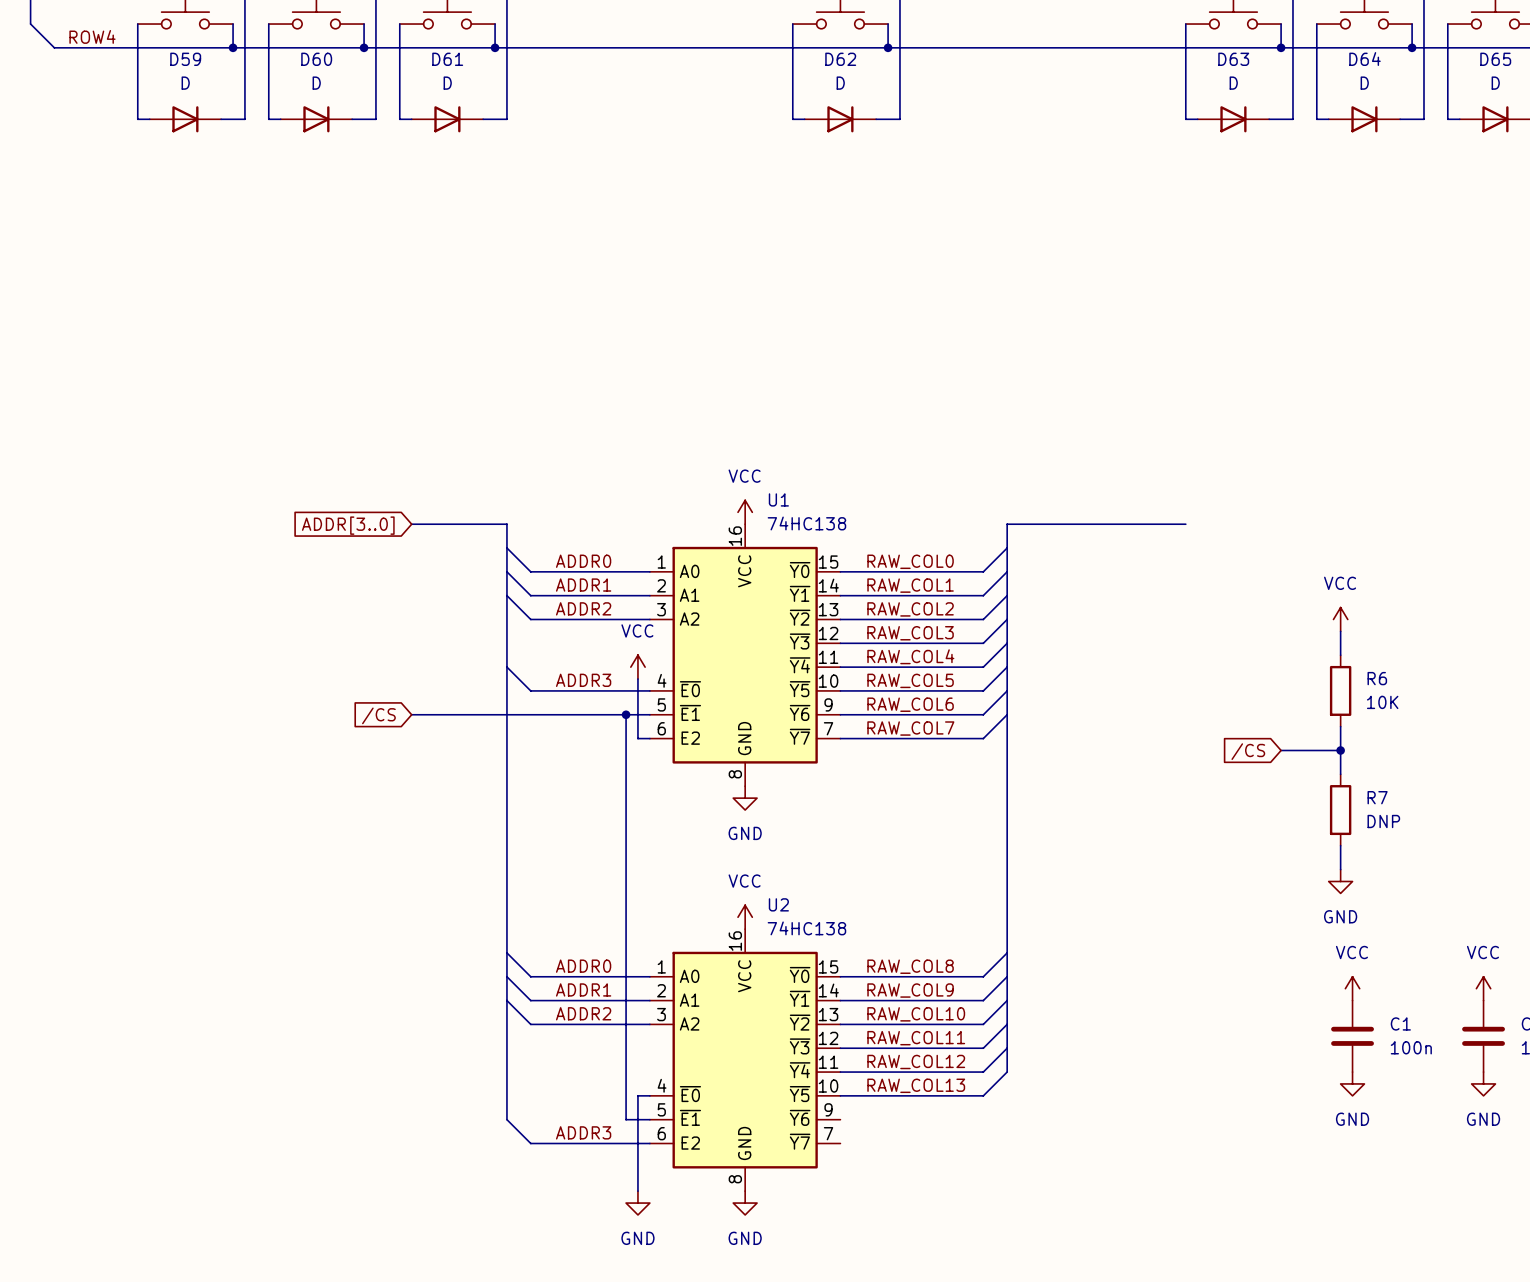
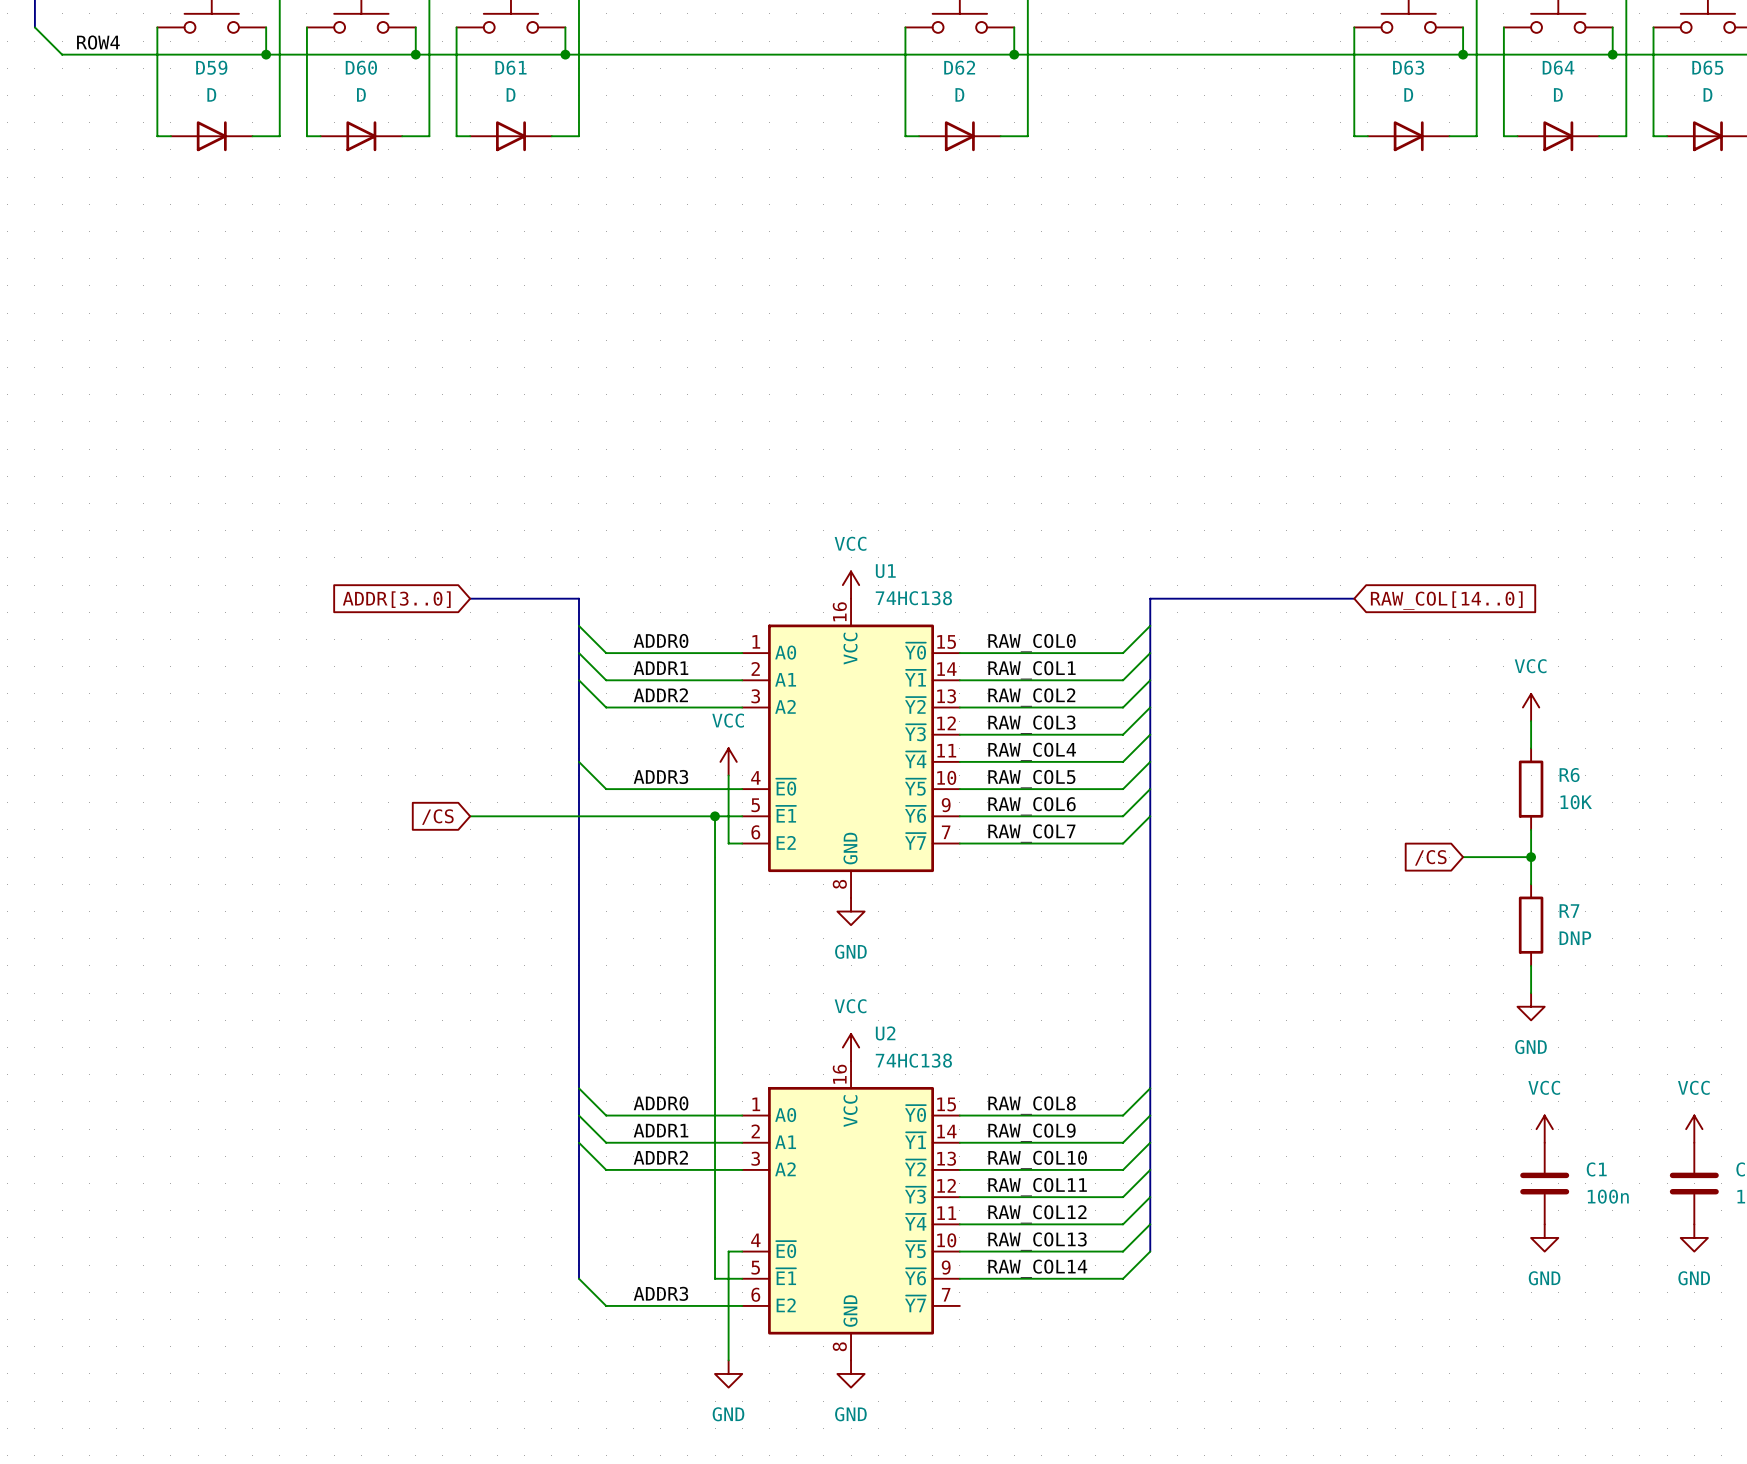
global label: none -> RAW_COL[14..0] (1446, 600)
bus: none -> (1150, 1224) (1150, 1251)
wire: none -> (1150, 1251) (1123, 1278) (959, 1278)
label: none -> RAW_COL14 (1037, 1268)

